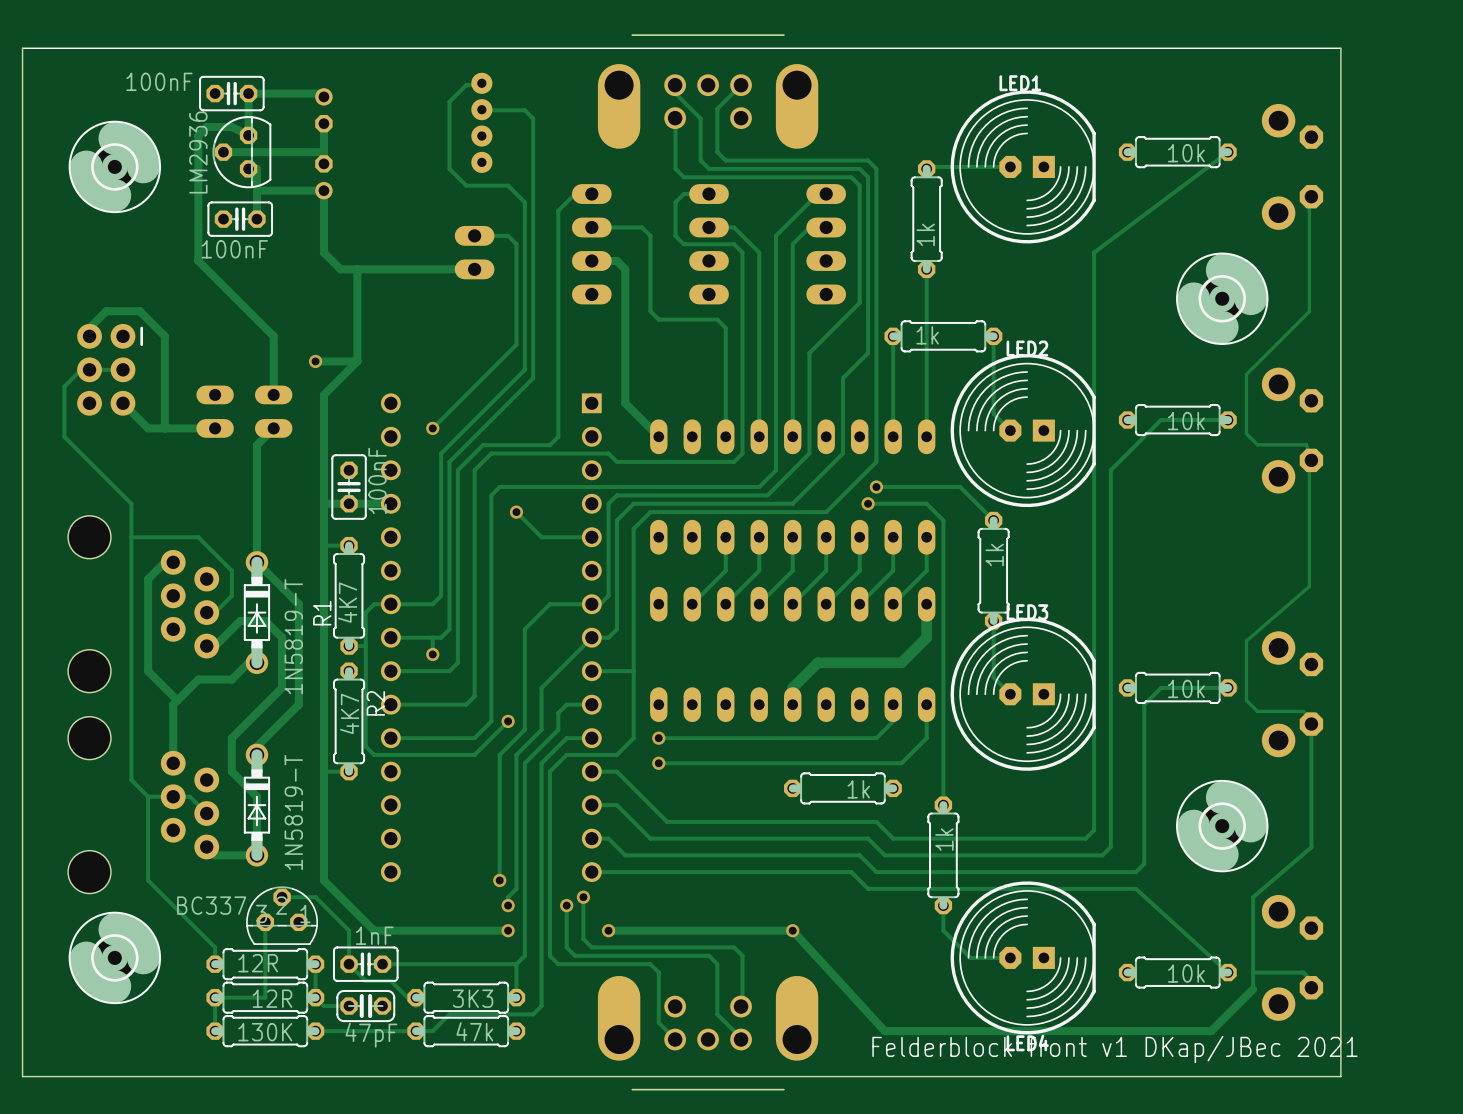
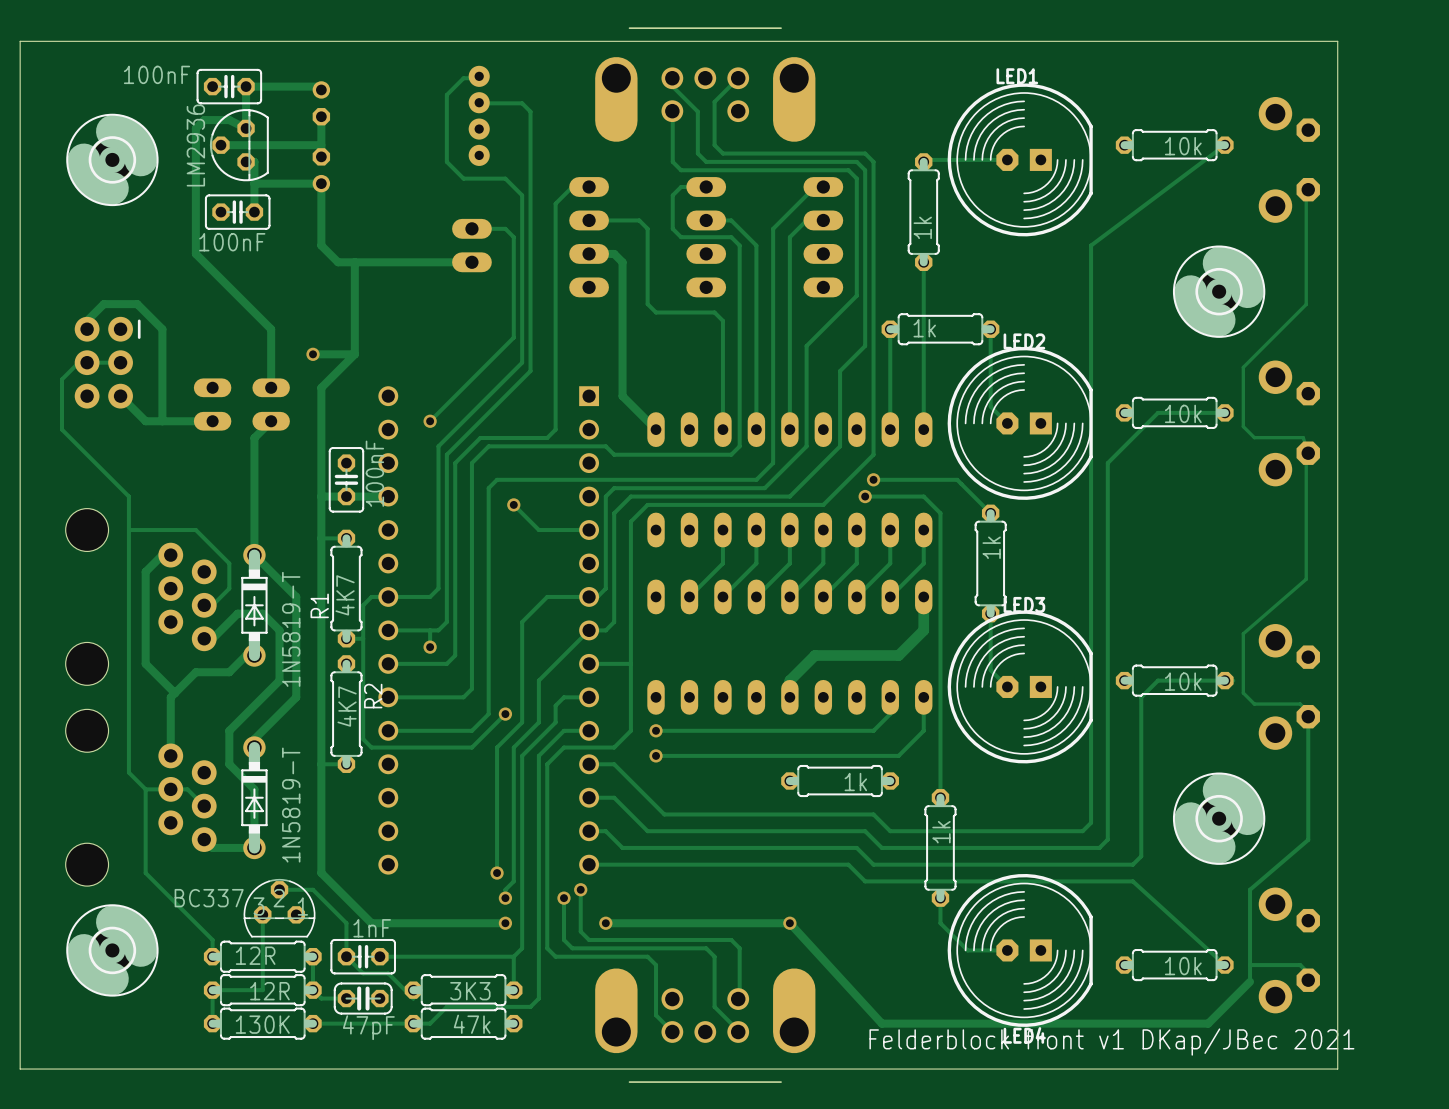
board edge: none -> (20, 41) (1337, 41)
line: (22, 48) (1340, 48) -> none

